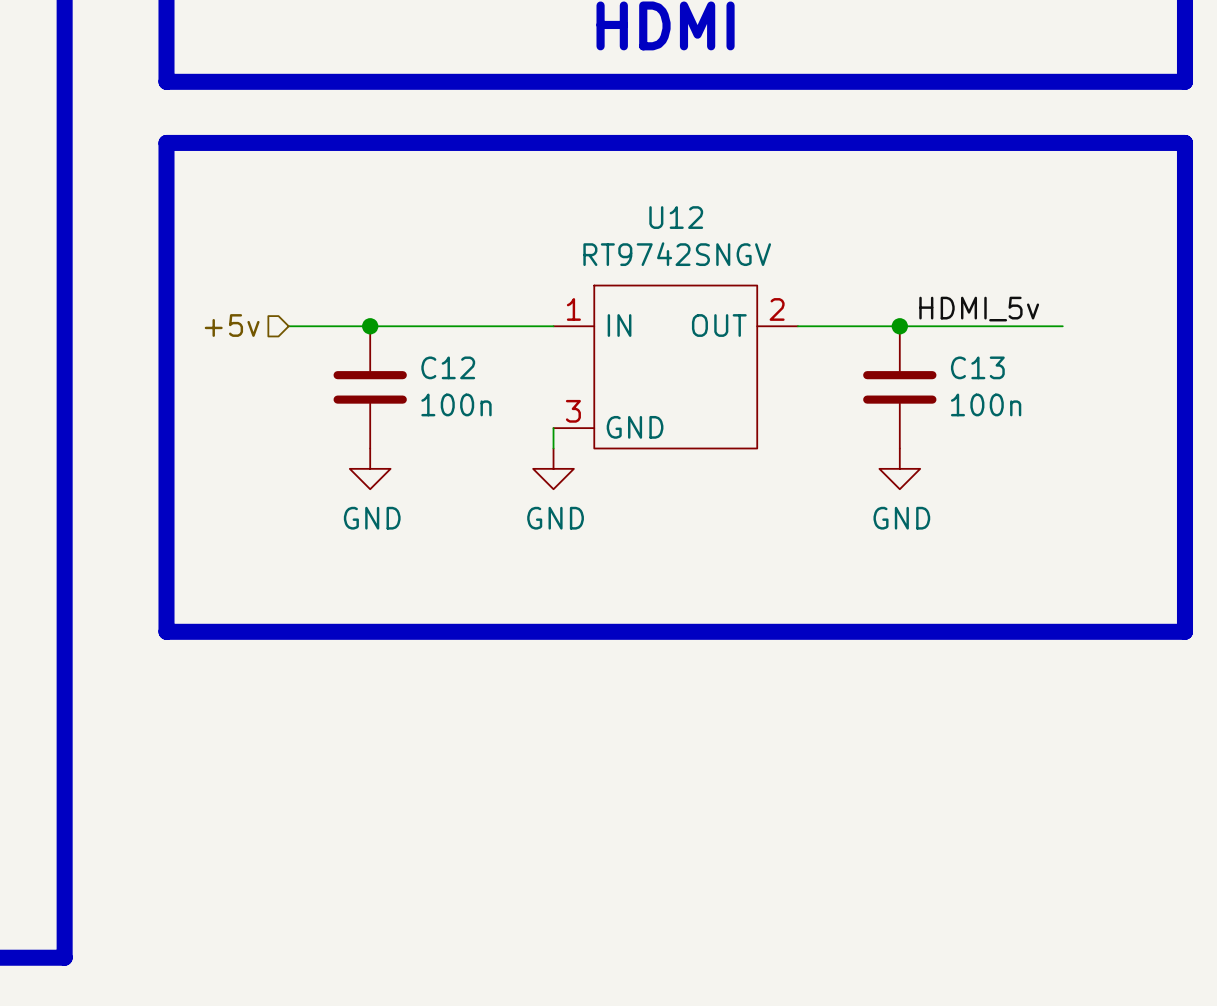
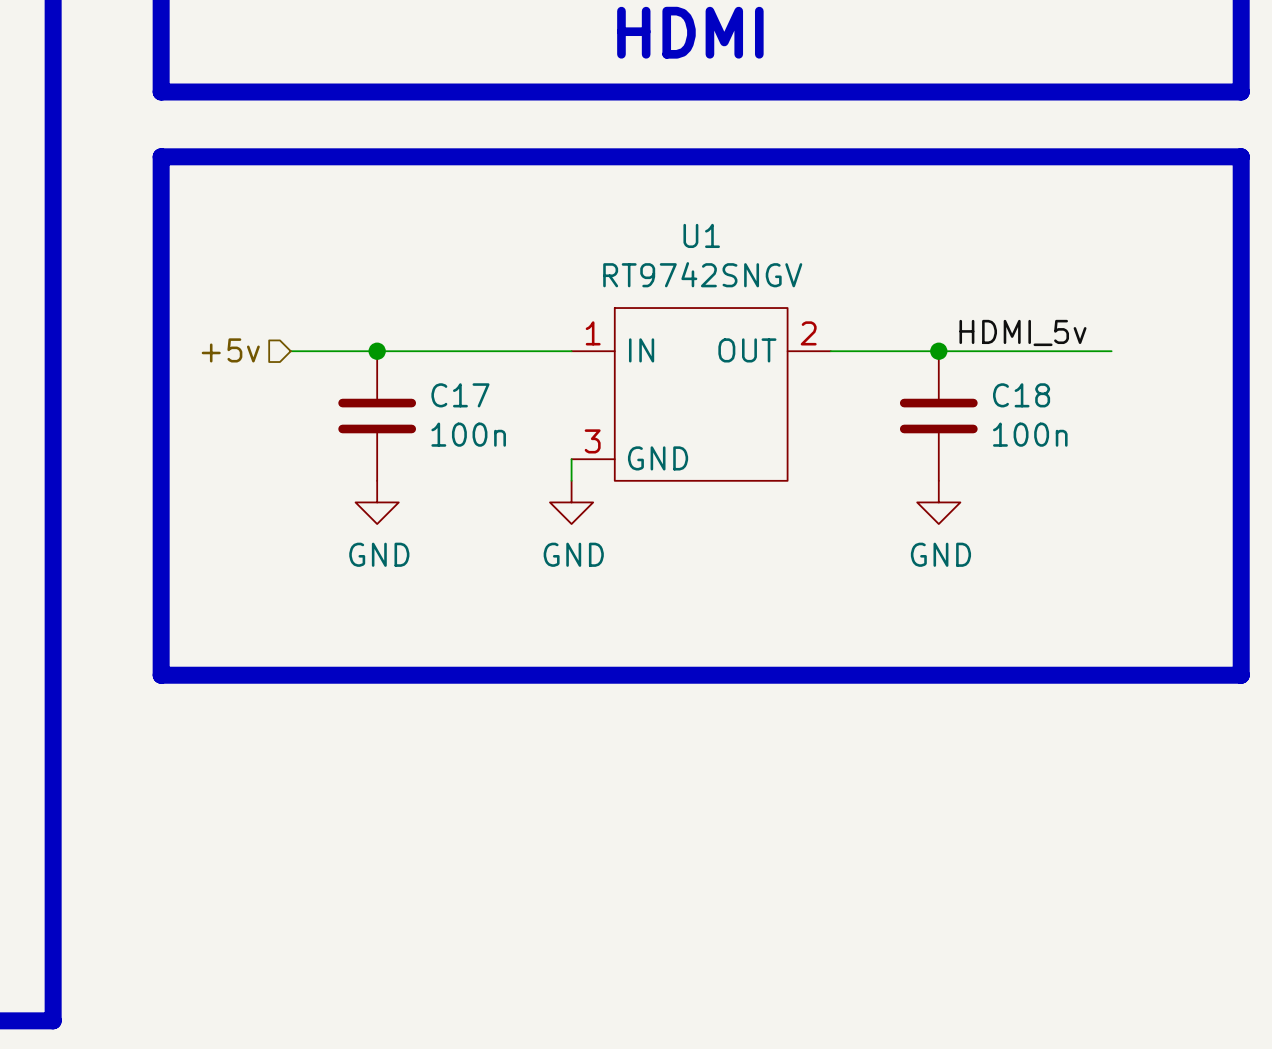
U12 name: U12 (676, 217) -> U1 (701, 235)
C12 name: C12 (448, 367) -> C17 (460, 395)
C13 name: C13 (977, 367) -> C18 (1021, 395)

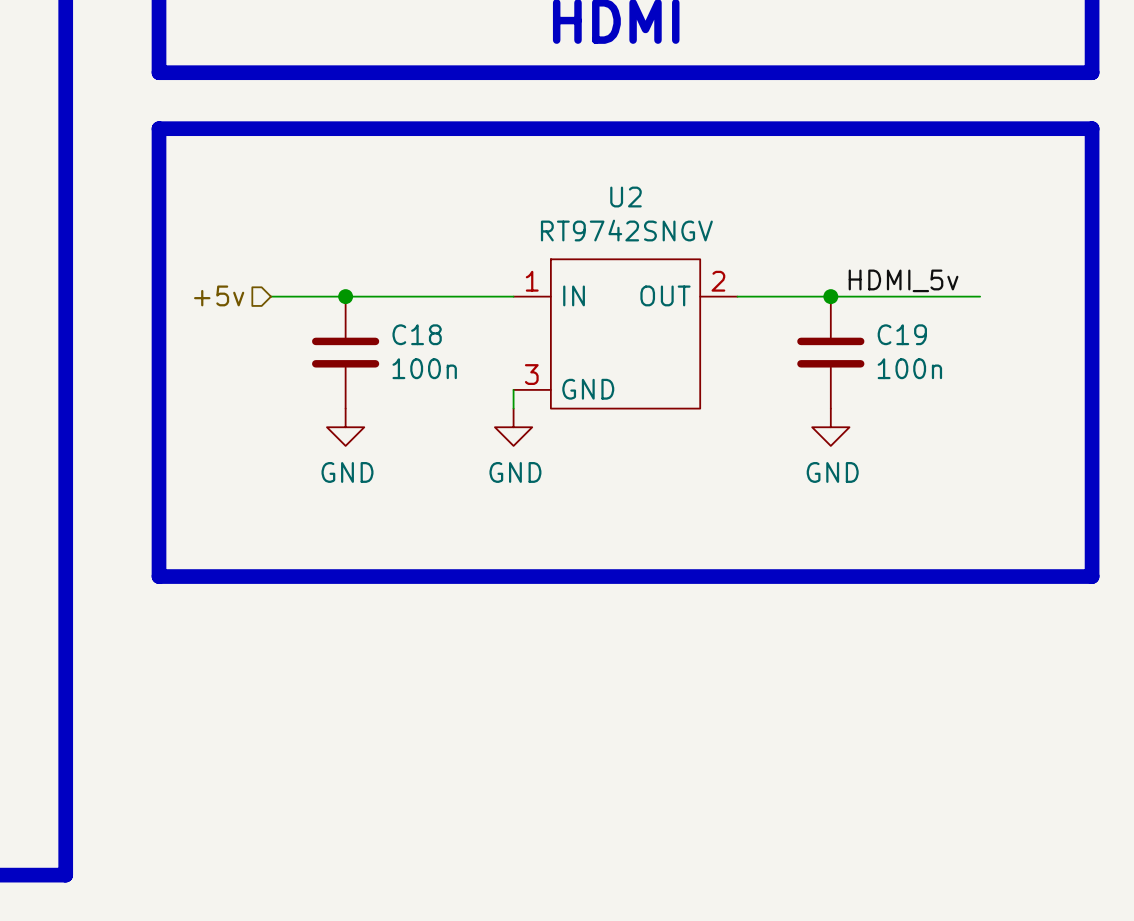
U1 name: U1 (701, 235) -> U2 (625, 197)
C17 name: C17 (460, 395) -> C18 (417, 334)
C18 name: C18 (1021, 395) -> C19 (902, 334)

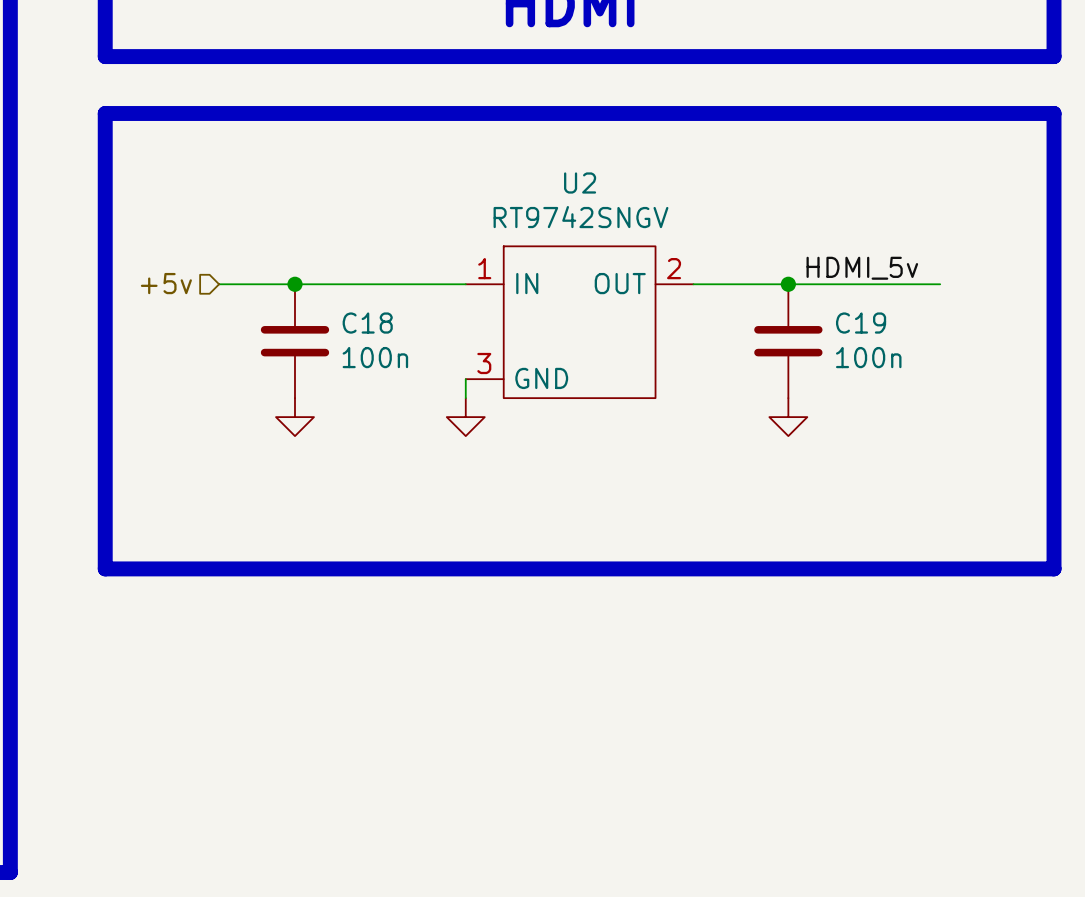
power symbol text: GND (347, 472) -> none
power symbol text: GND (515, 472) -> none
power symbol text: GND (832, 472) -> none

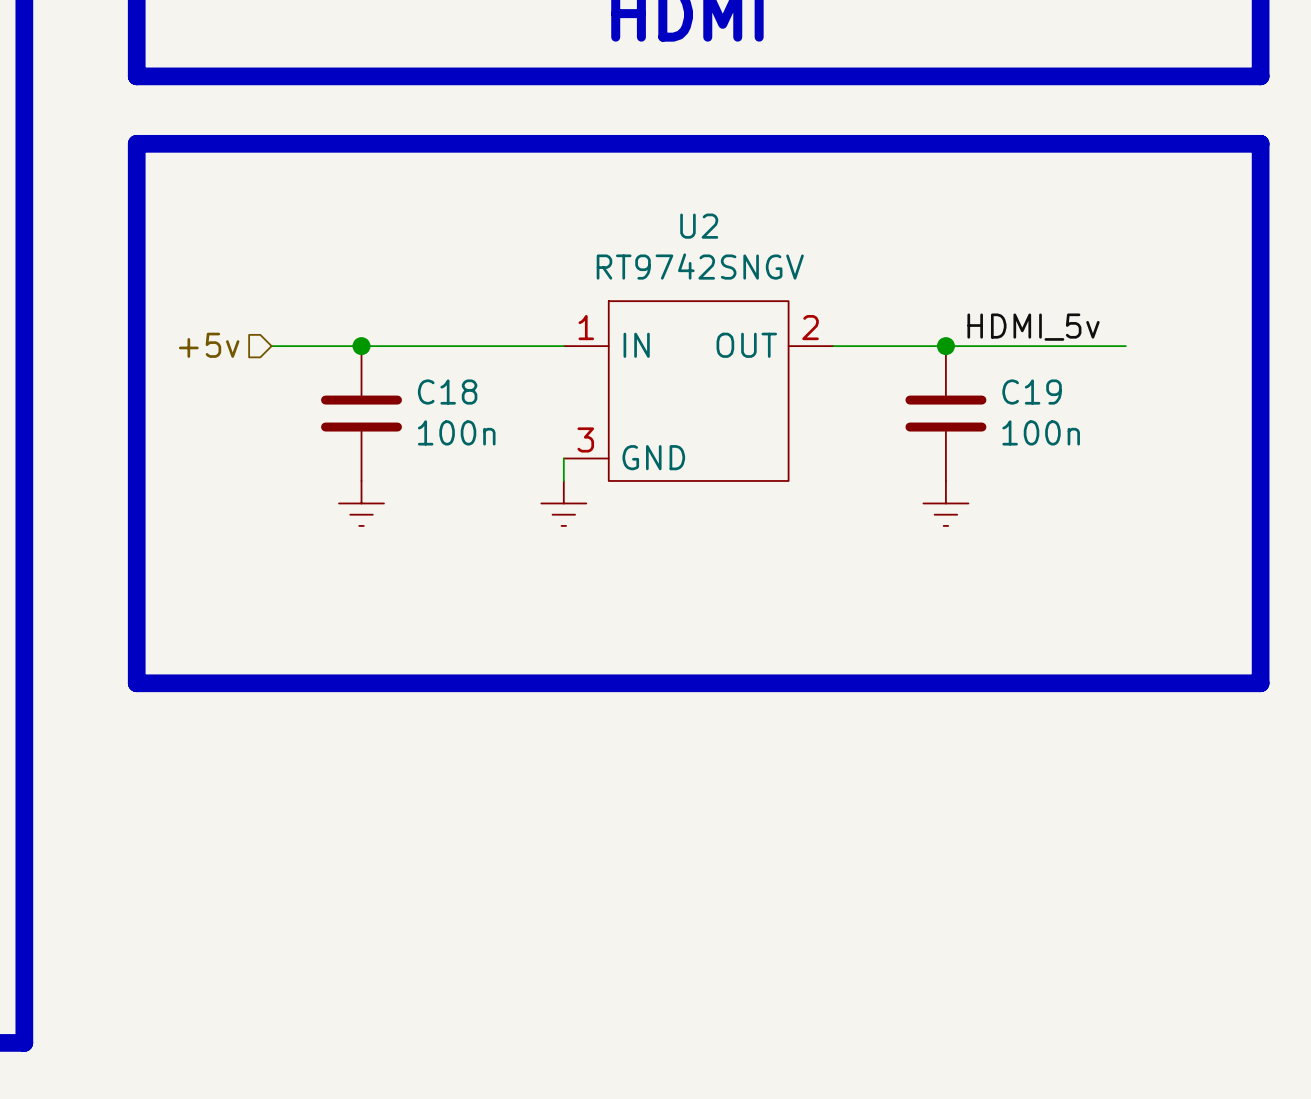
power symbol shape: [276, 398, 314, 437] -> [339, 480, 384, 526]
power symbol shape: [446, 398, 485, 437] -> [541, 480, 587, 526]
power symbol shape: [769, 398, 808, 437] -> [923, 480, 969, 526]

